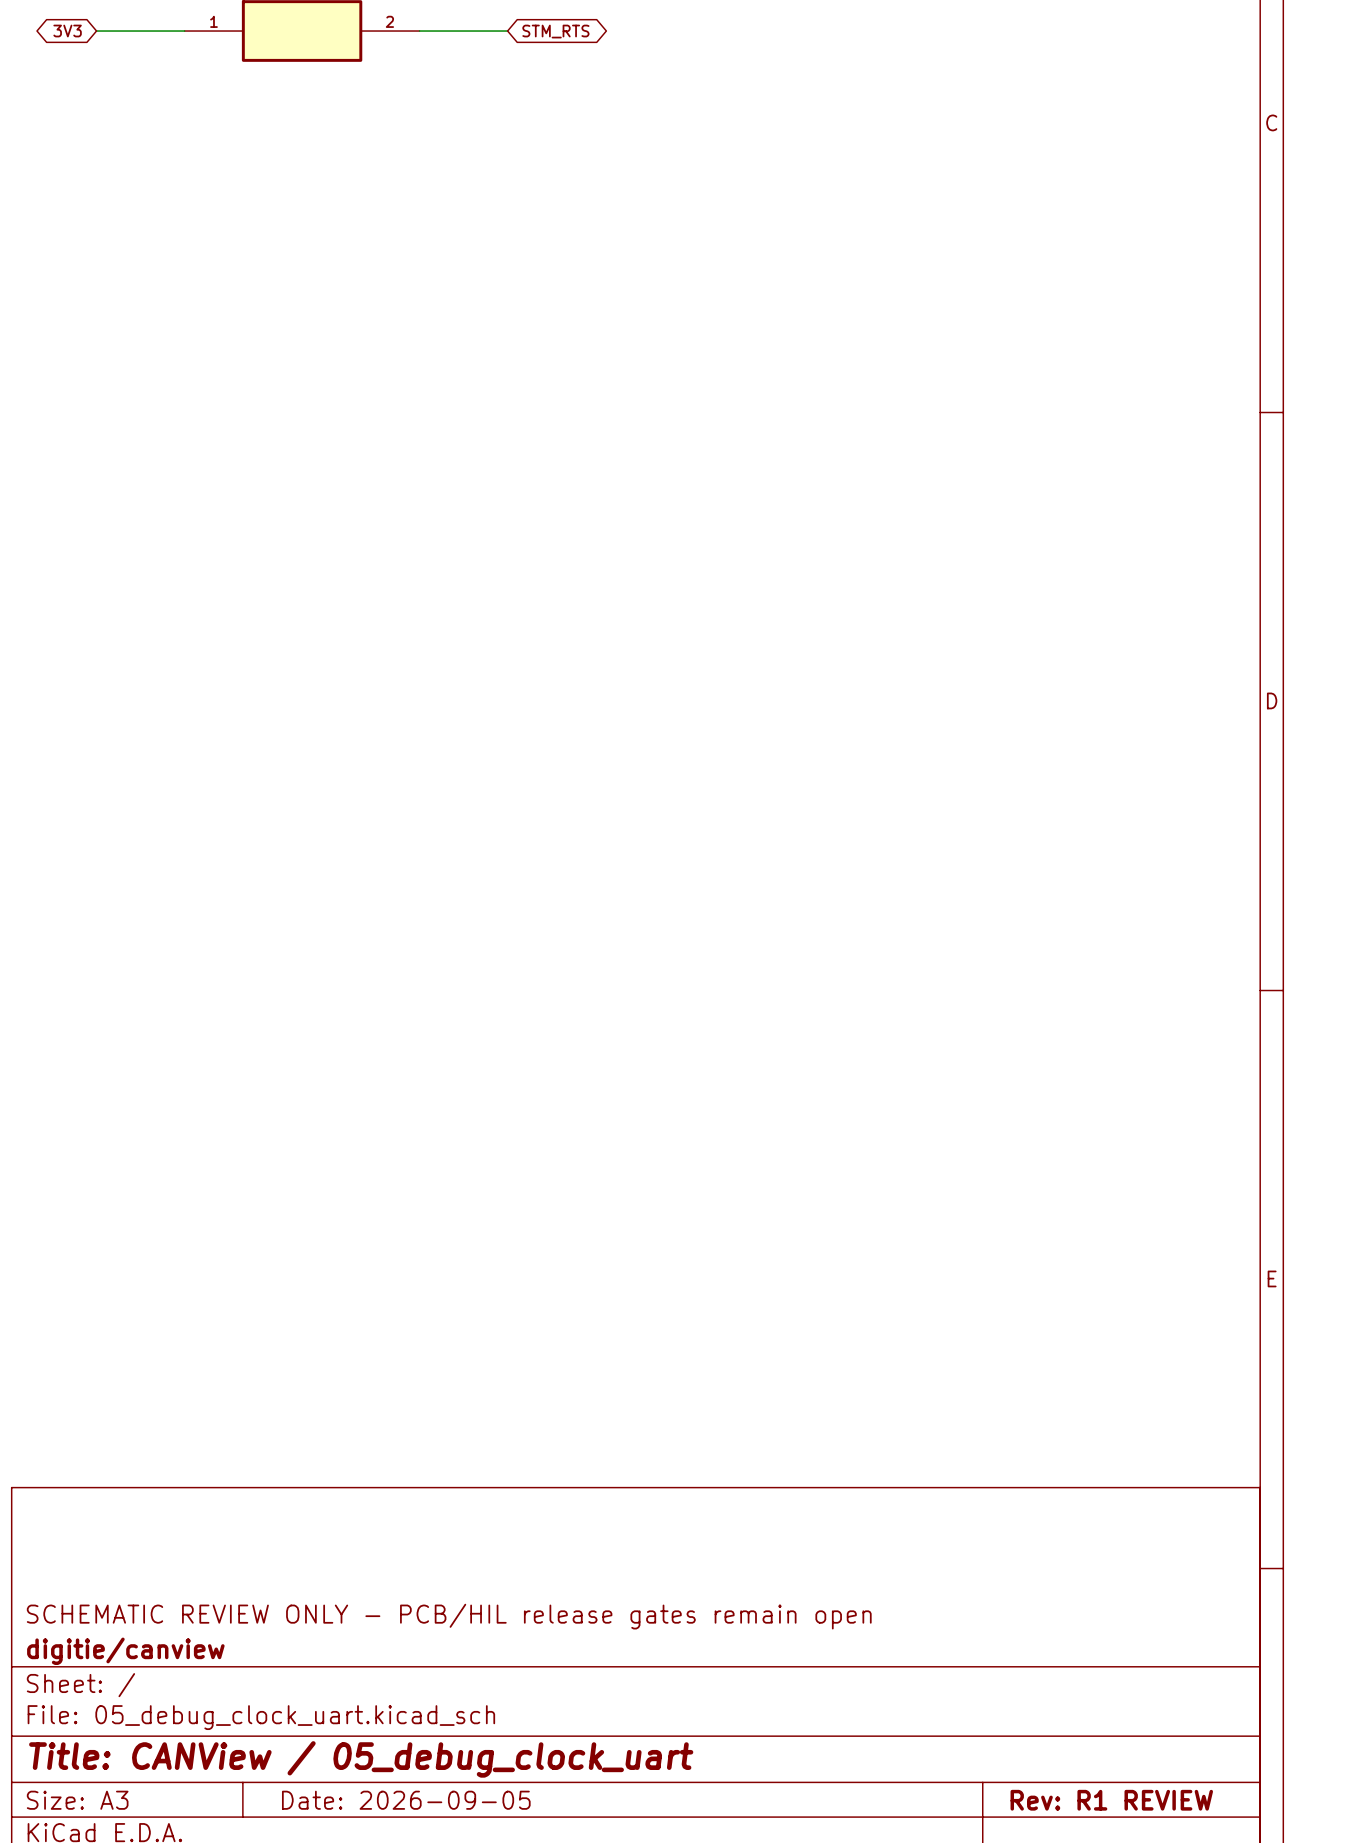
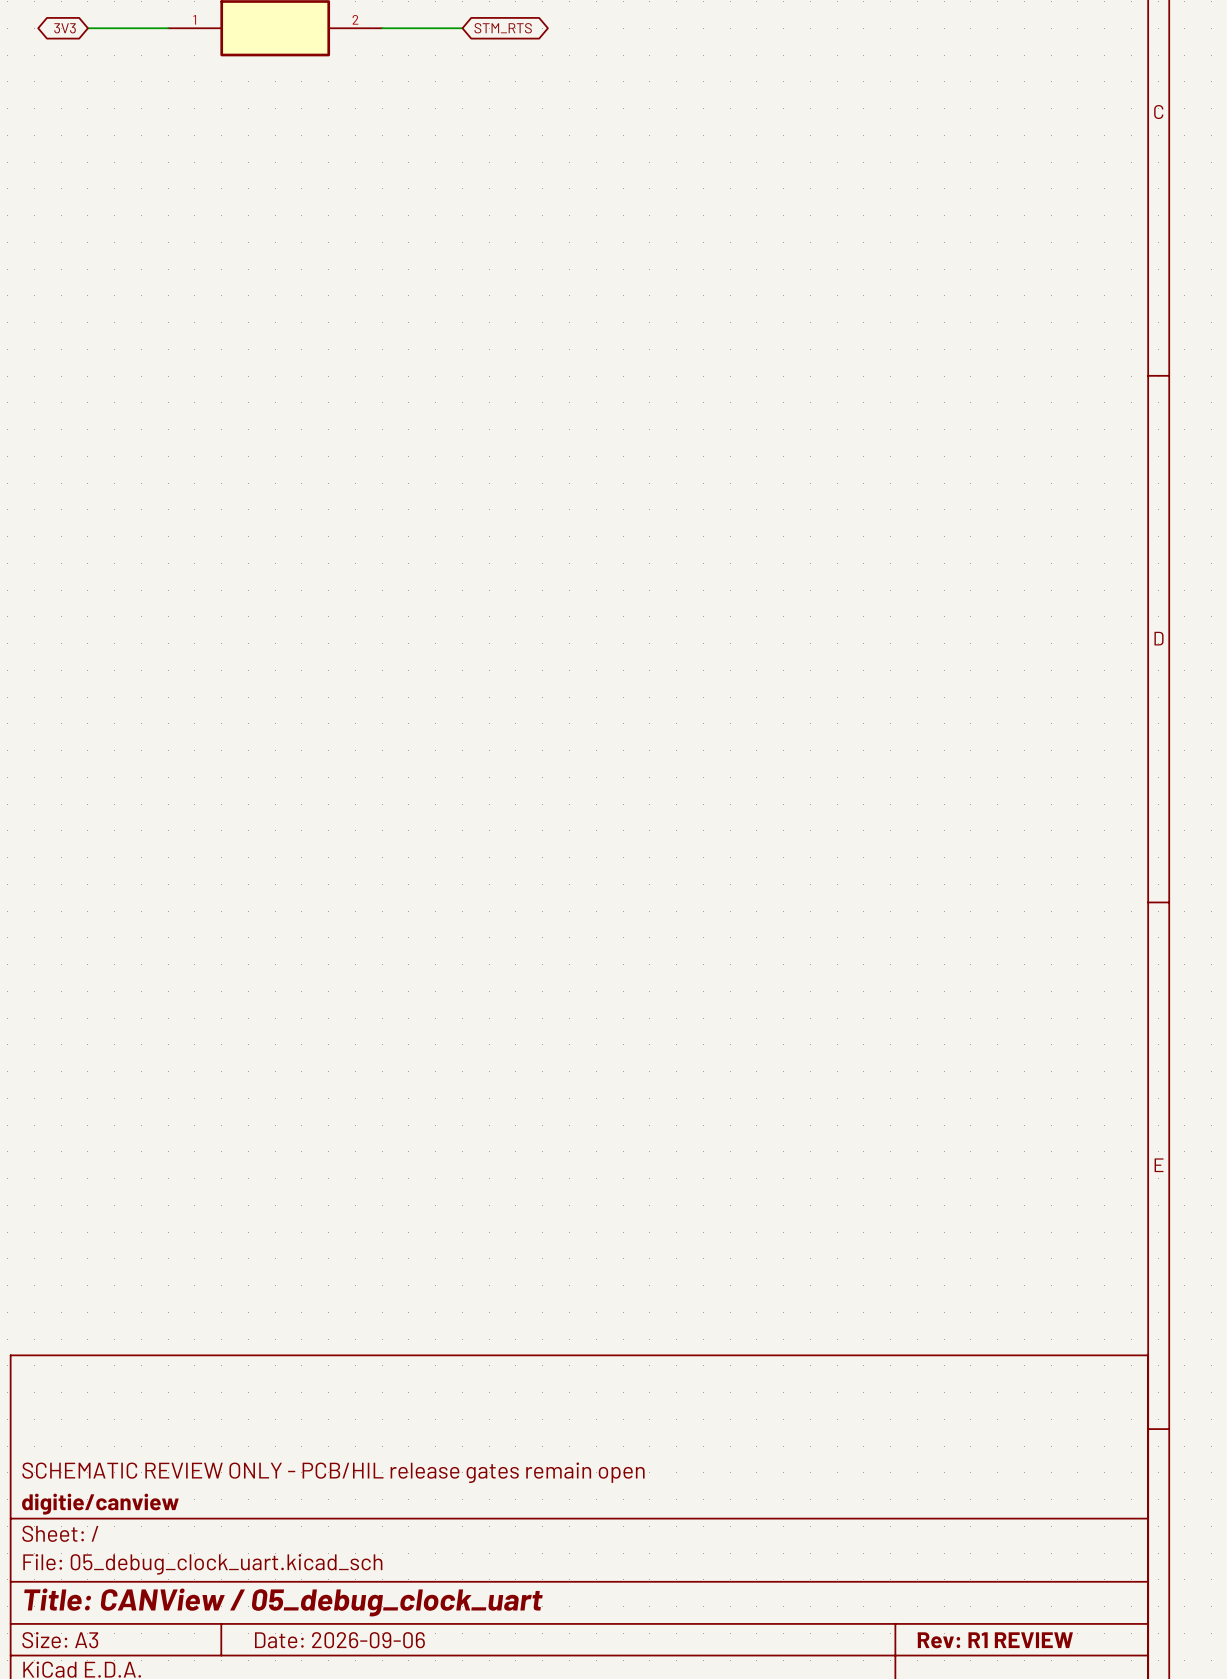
title block: Date: 2026-09-05 (406, 1800) -> Date: 2026-09-06 (339, 1640)

